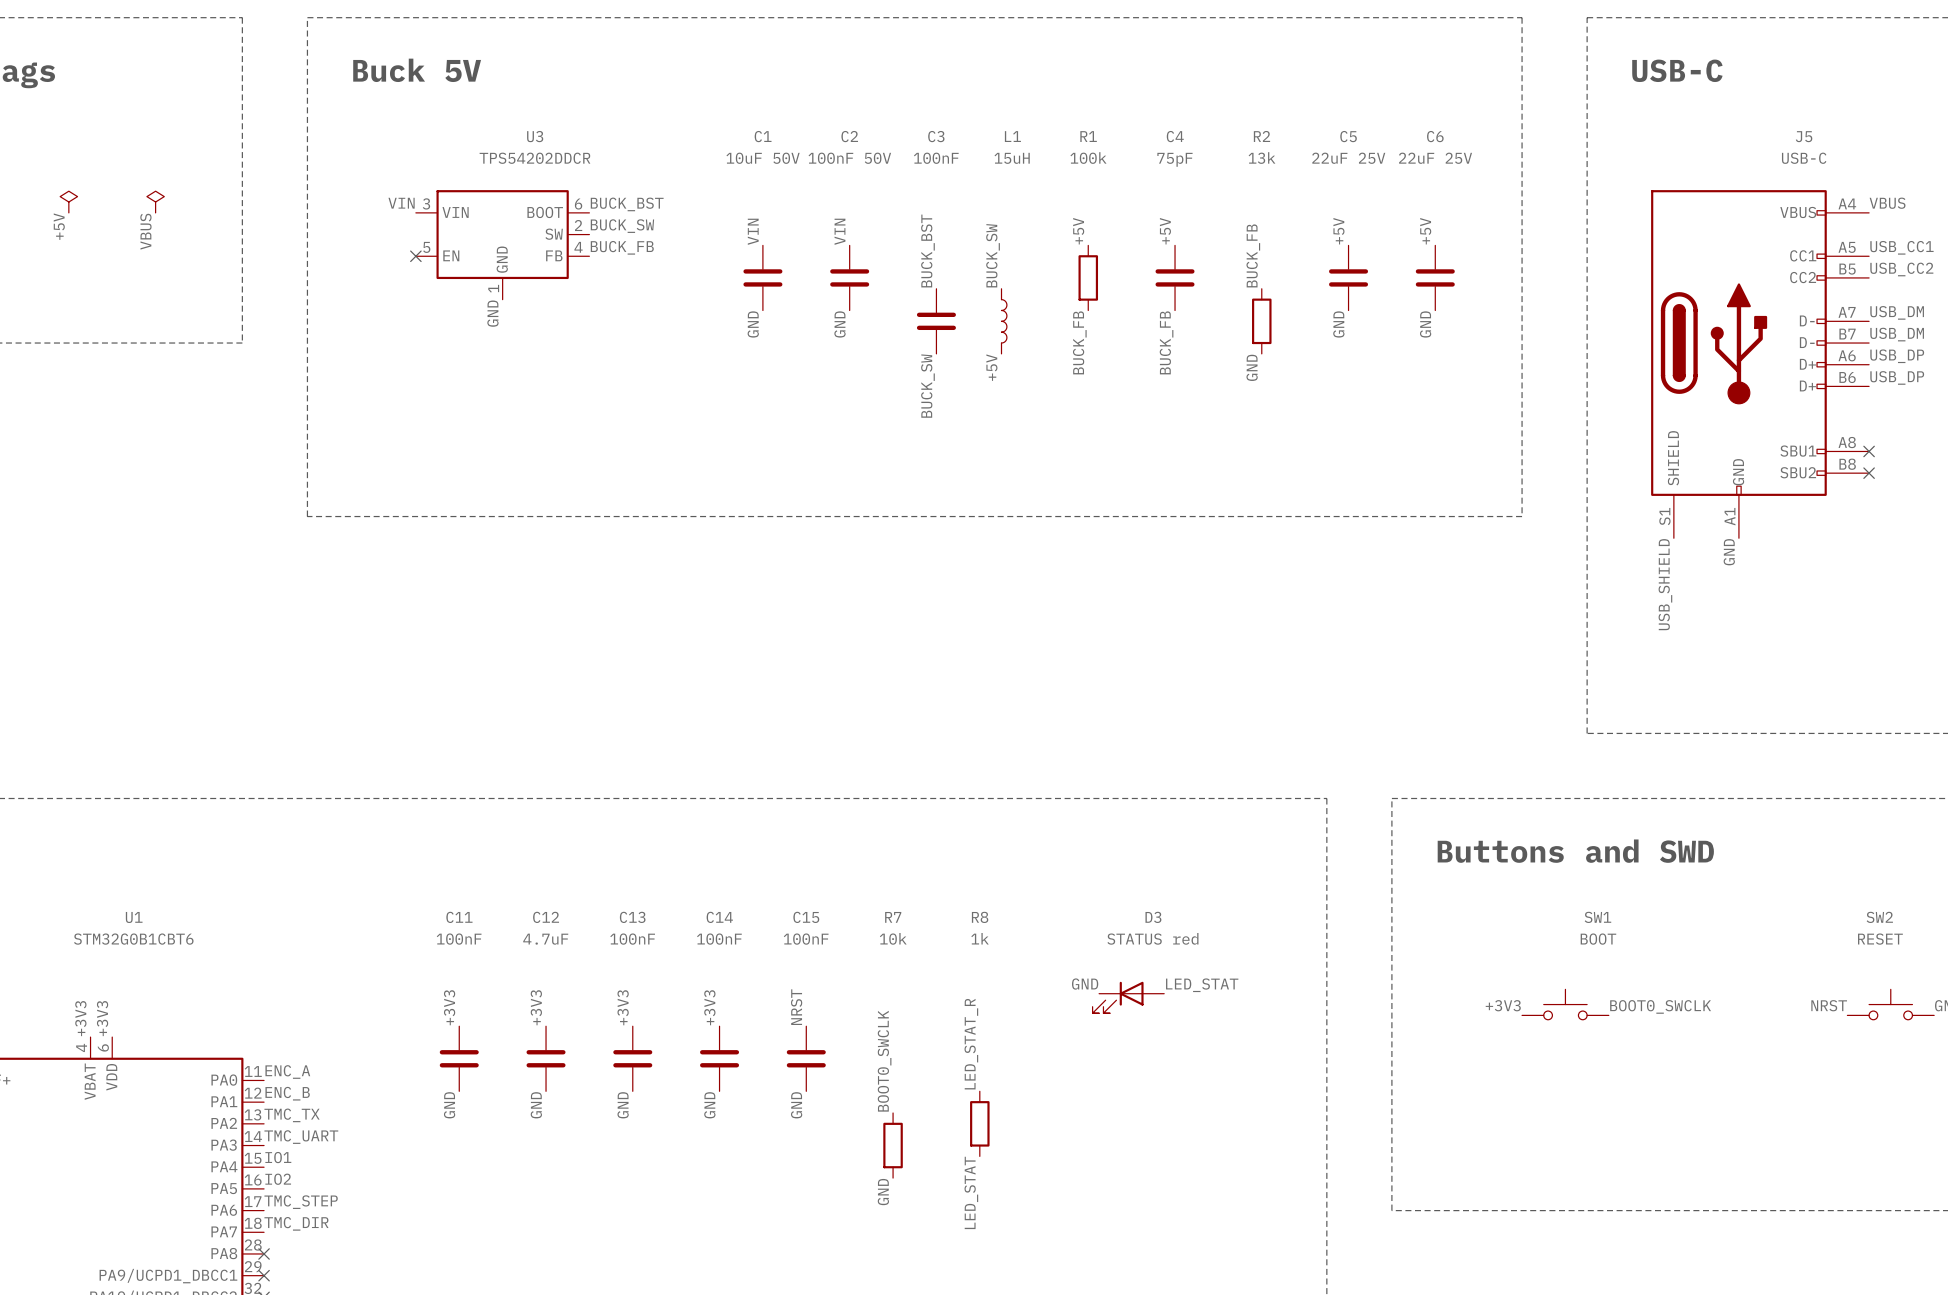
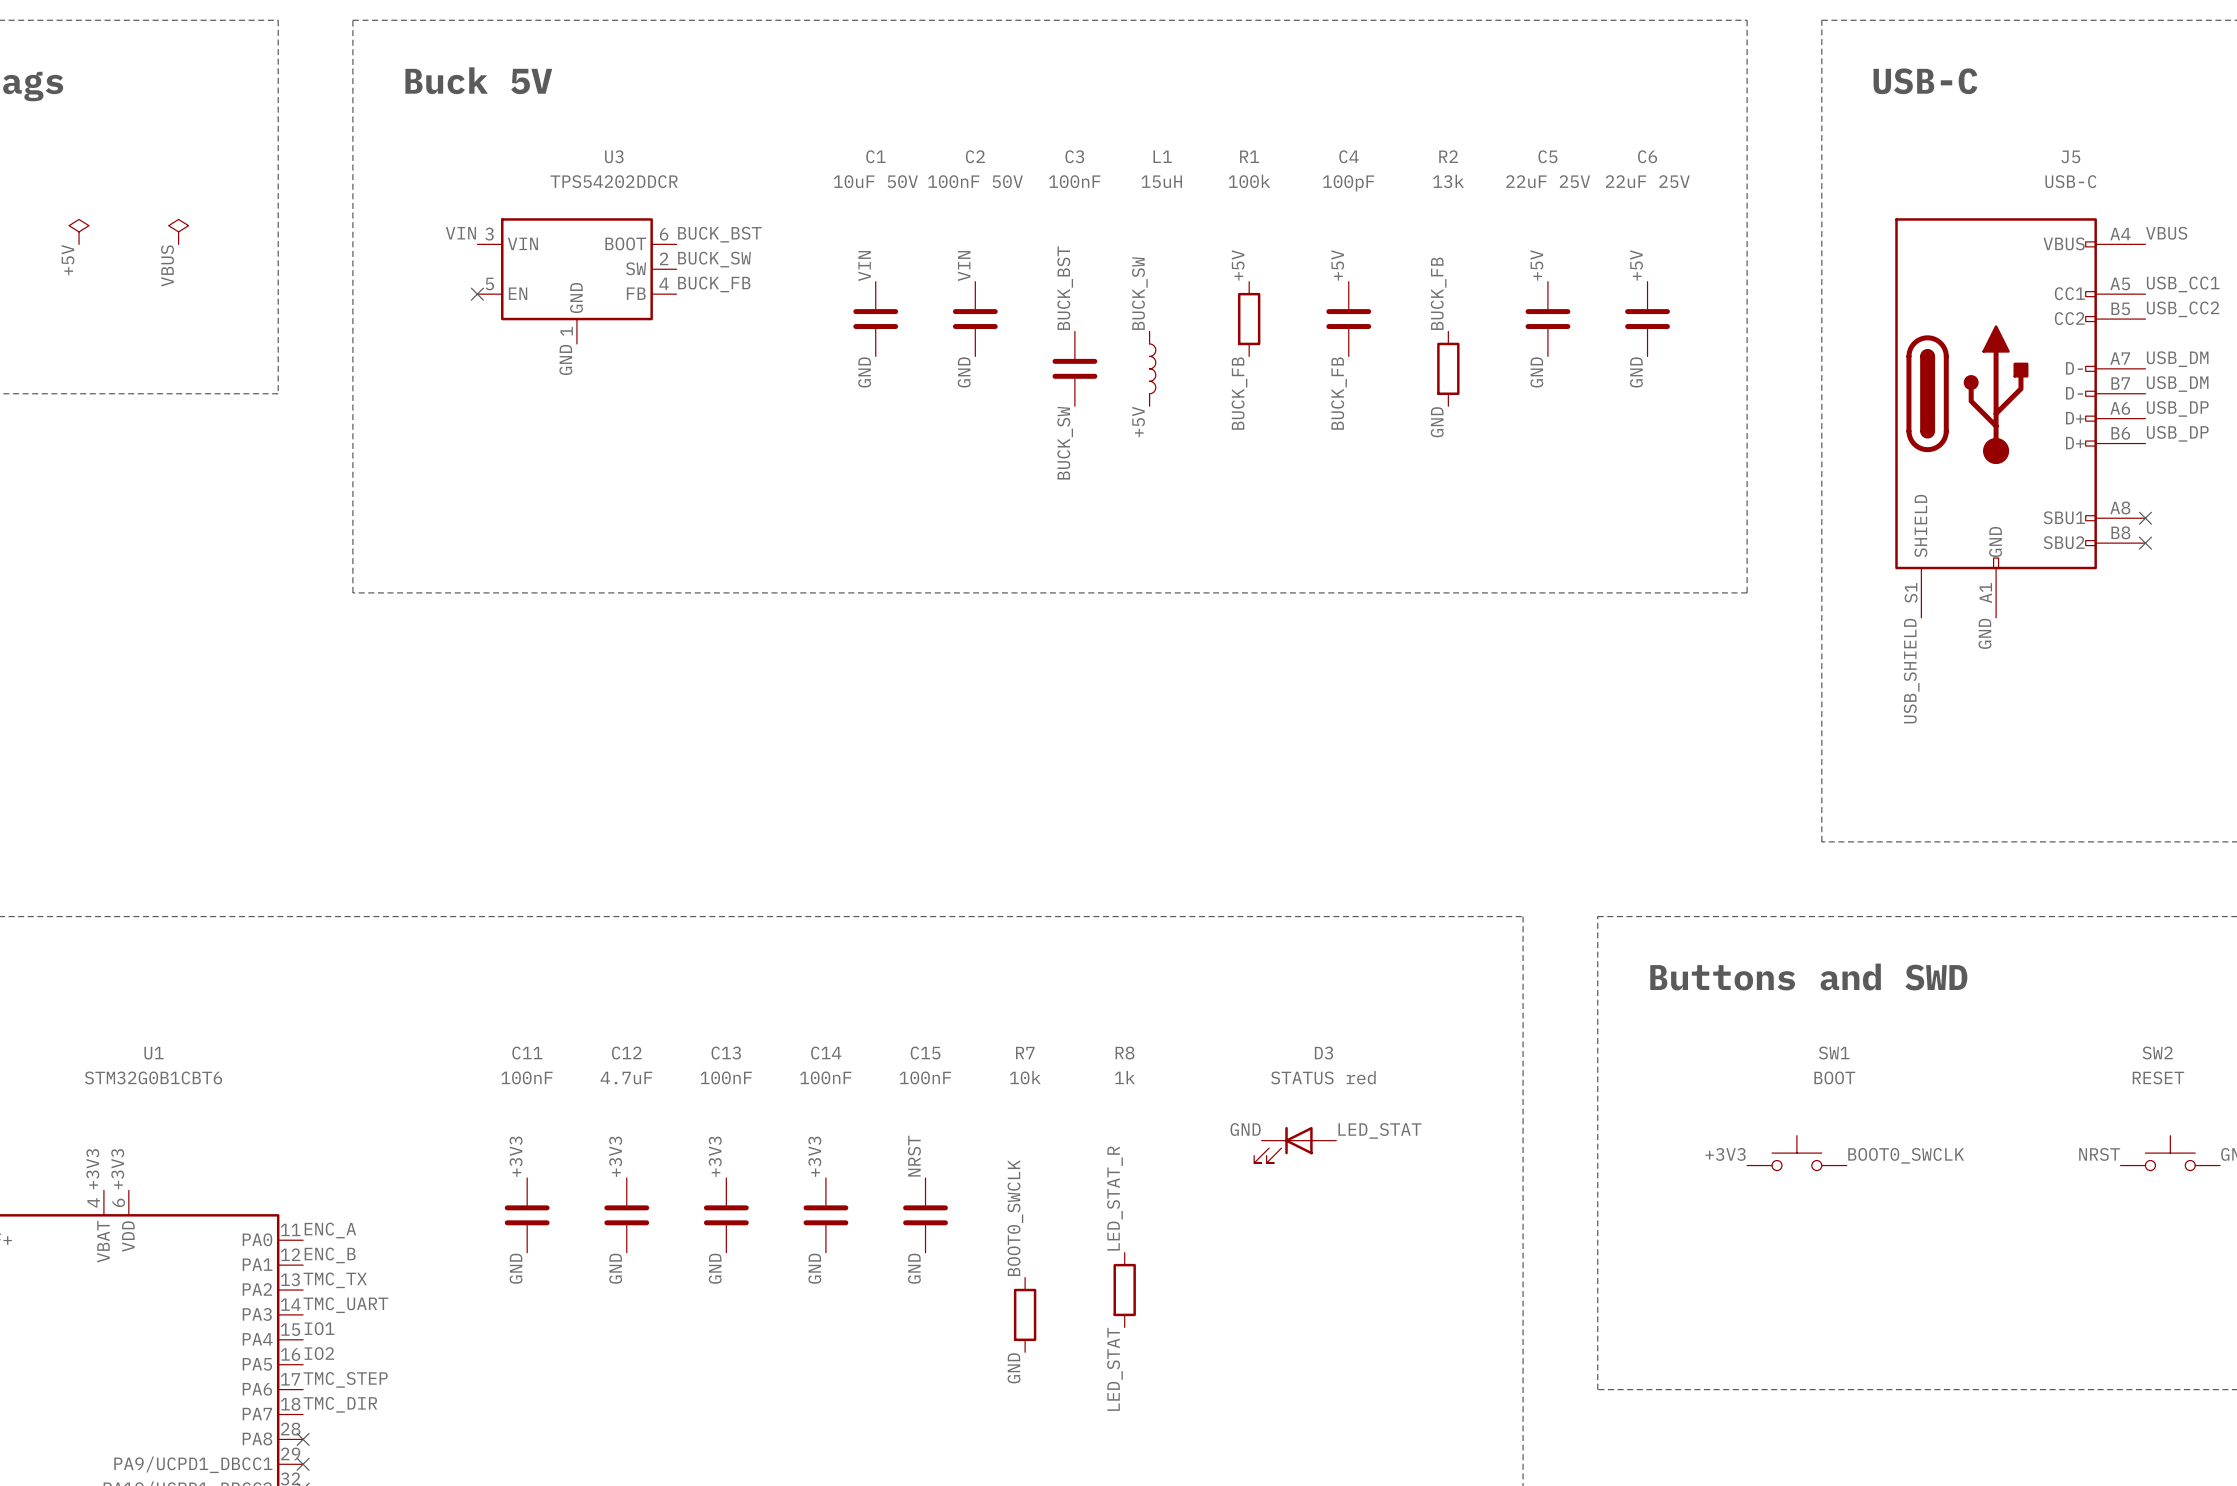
C4 value: 75pF (1174, 159) -> 100pF (1348, 183)

